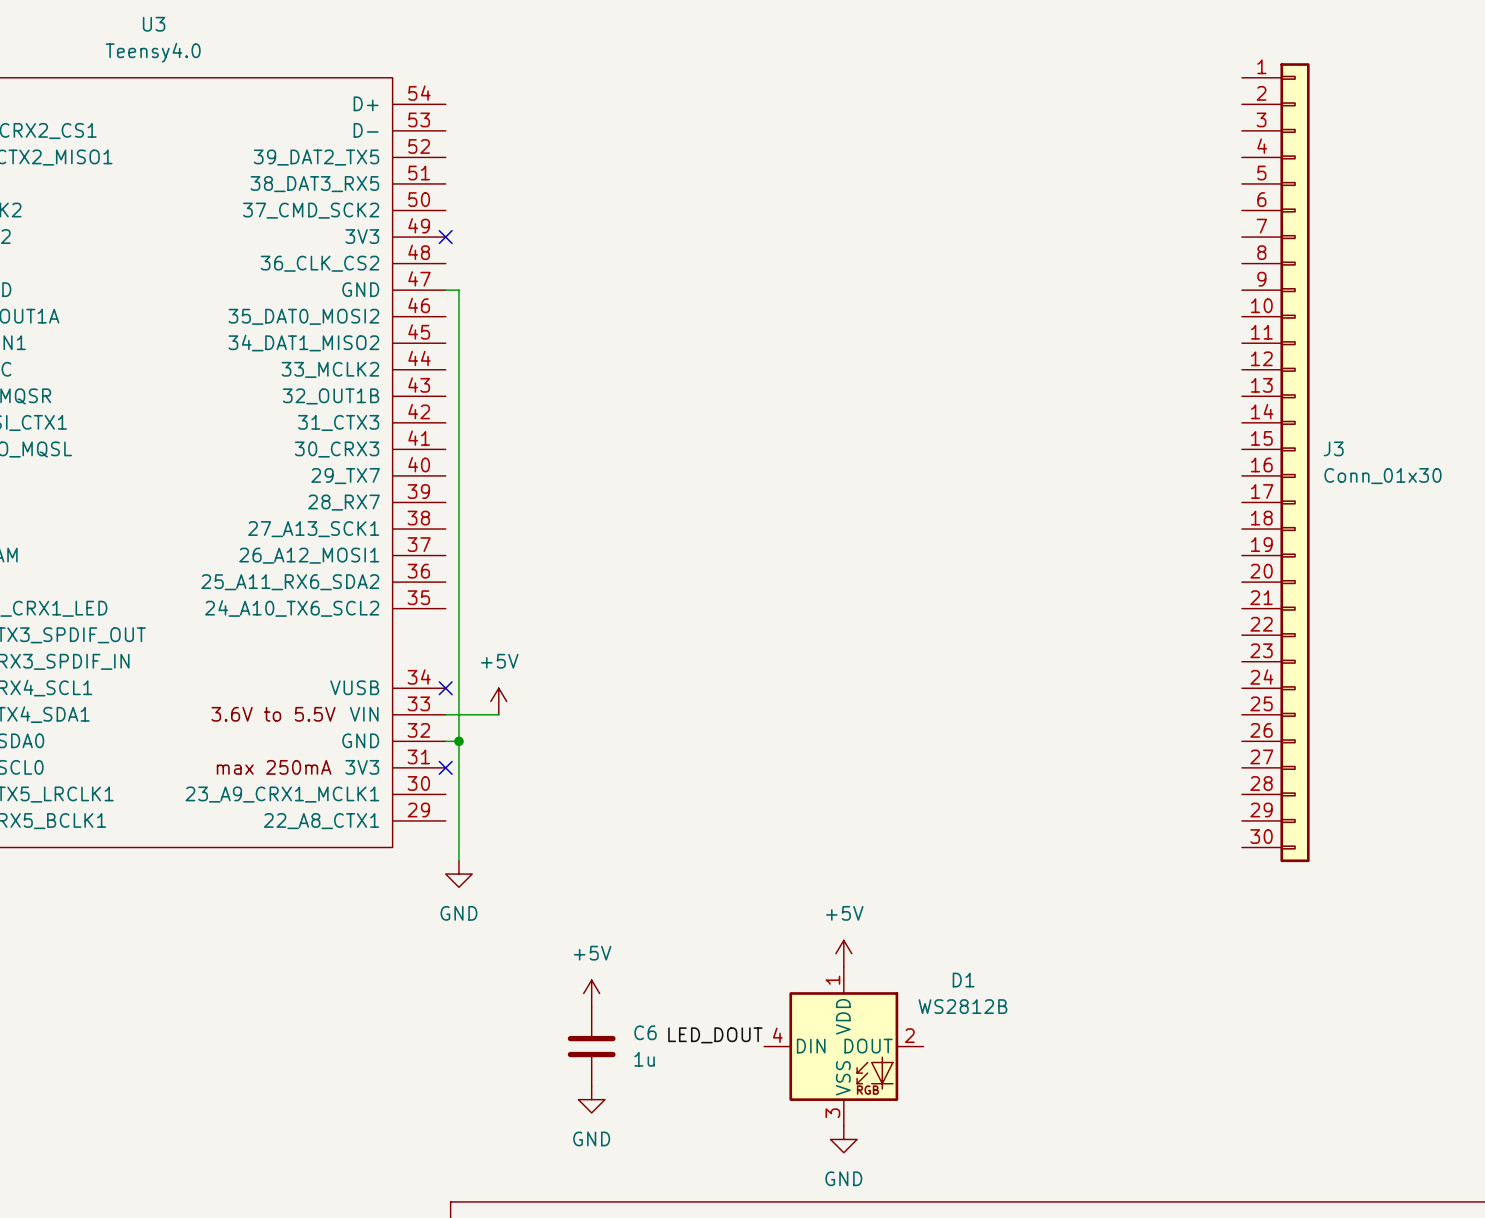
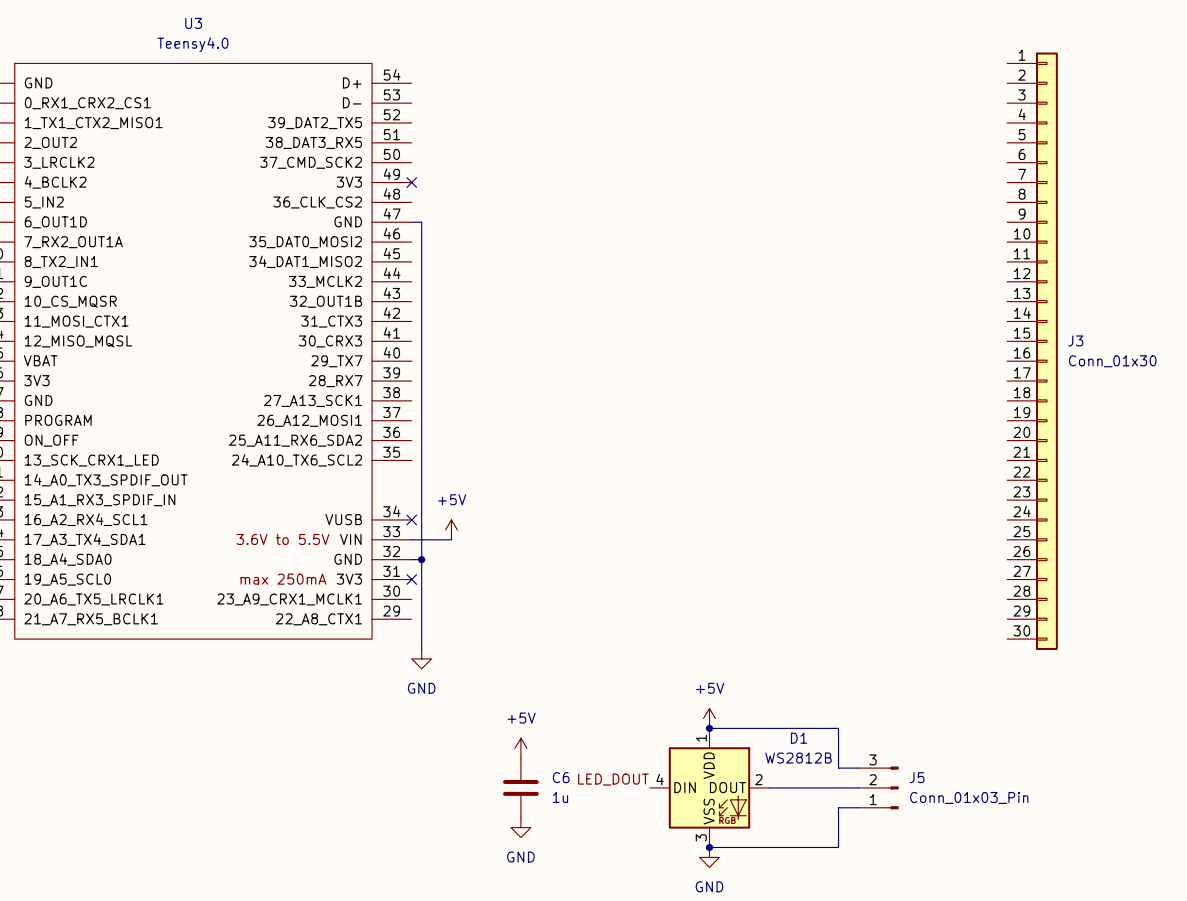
wire: none -> (709, 728) (838, 728) (838, 768) (858, 768)
junction: none -> (709, 728)
wire: none -> (769, 787) (858, 787)
J5: none -> Conn_01x03_Pin (878, 787)
wire: none -> (858, 807) (838, 807) (838, 847) (709, 847)
junction: none -> (709, 847)

